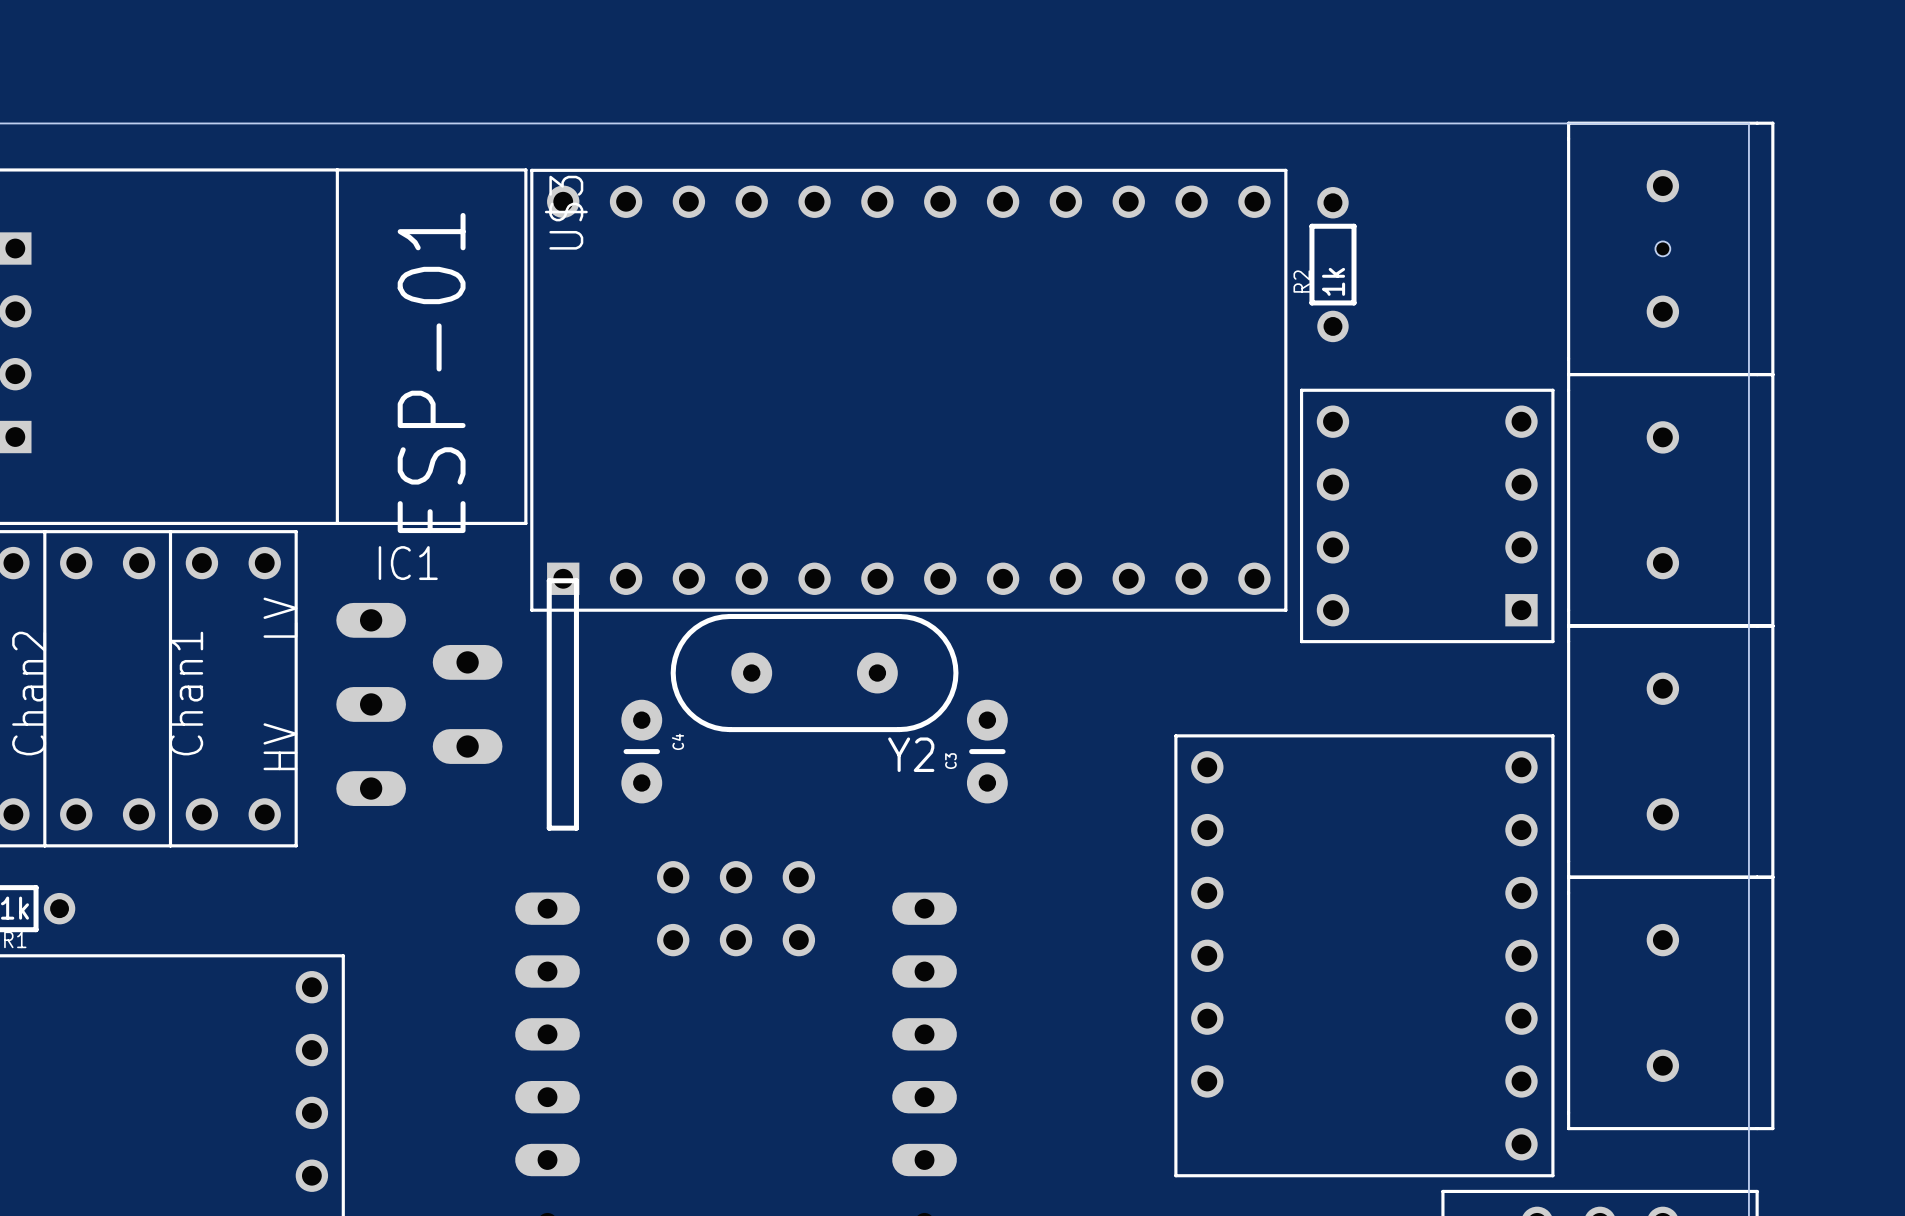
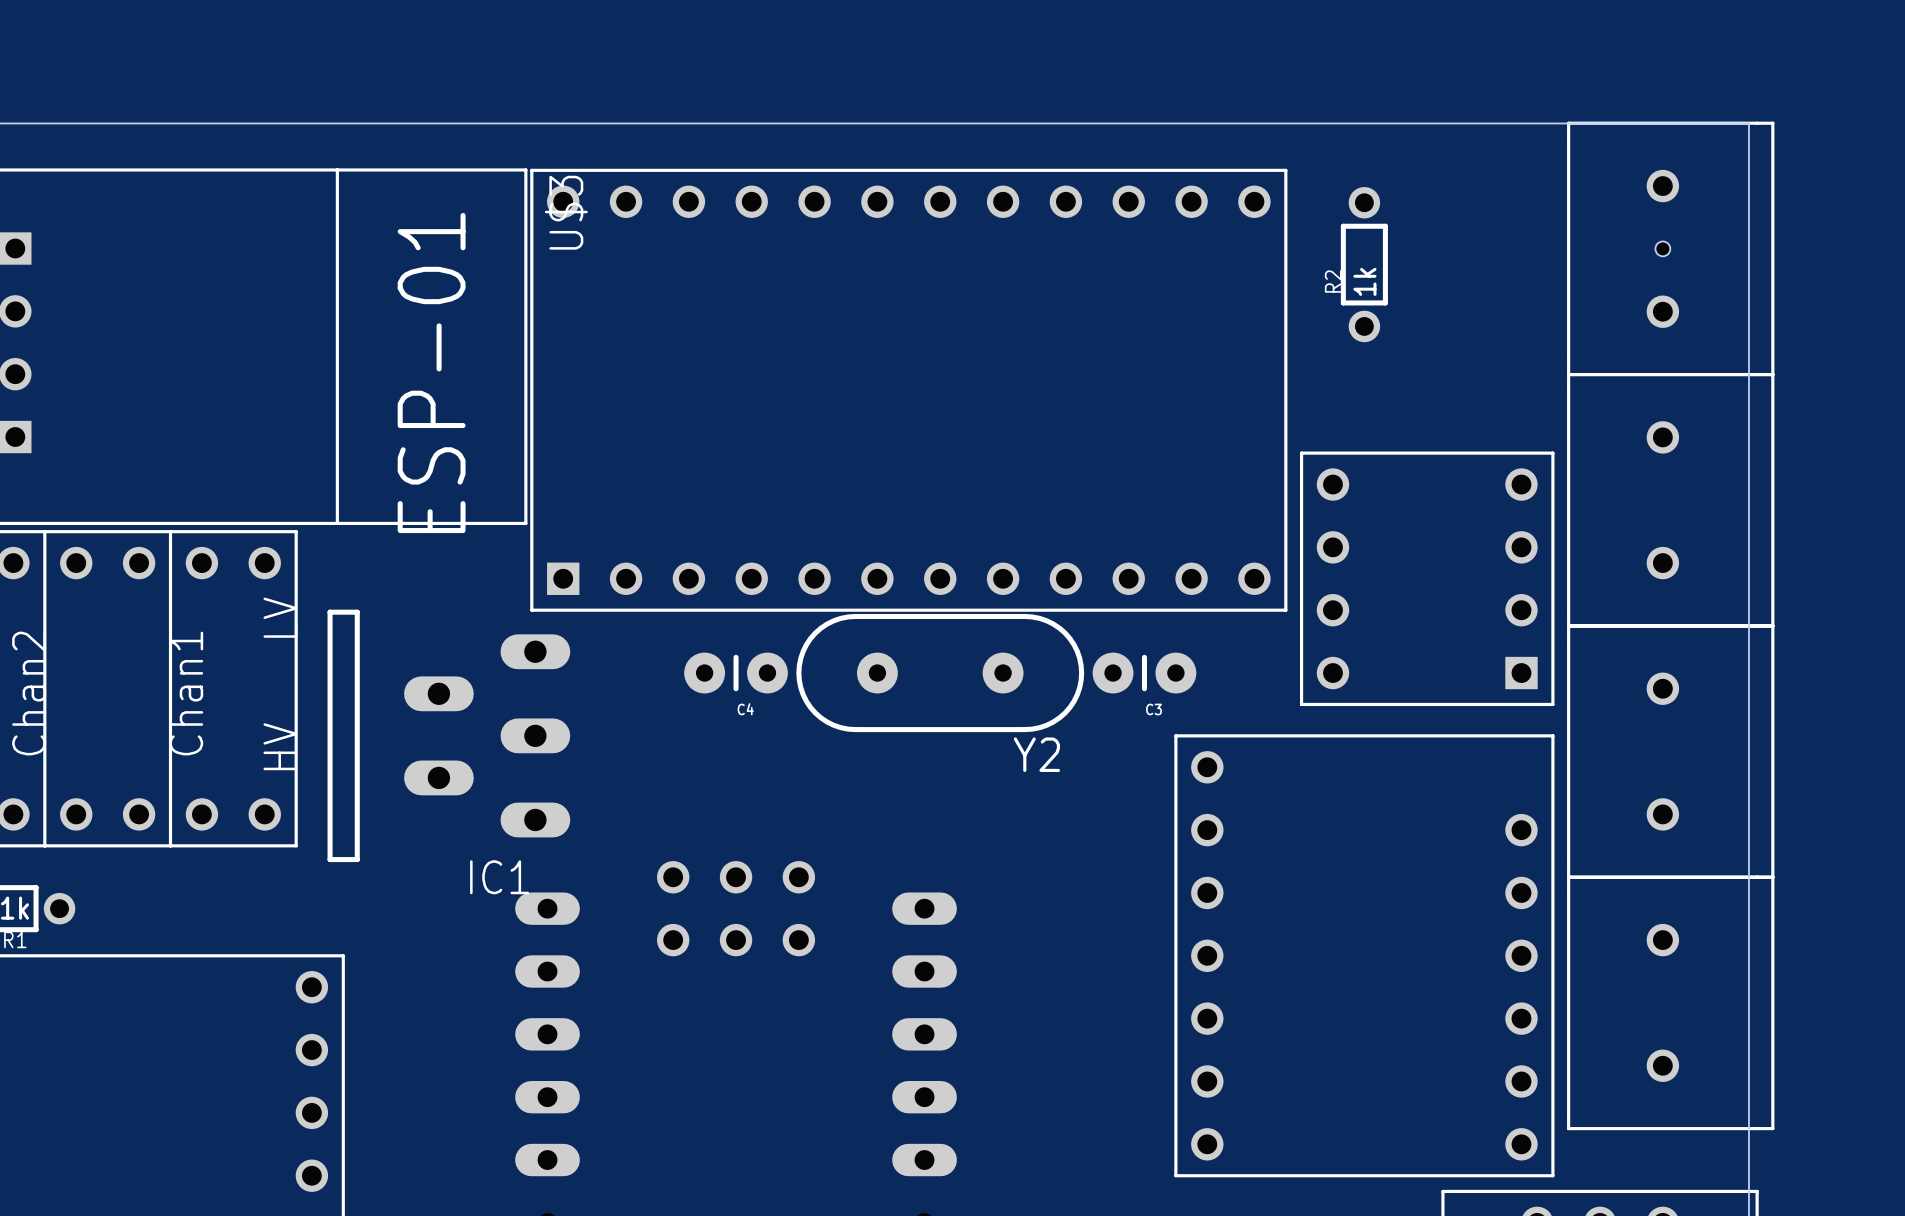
R2 position: (1332, 264) -> (1364, 264)
part position: (1427, 515) -> (1427, 578)
Y2 position: (814, 673) -> (940, 673)
IC1 rotation: 0° (457, 704) -> 180° (448, 735)
C4 rotation: 0° (641, 751) -> 90° clockwise (736, 673)
C4 position: (641, 751) -> (736, 673)
C3 rotation: 0° (987, 751) -> 90° clockwise (1144, 673)
C3 position: (987, 751) -> (1144, 673)
C3 name position: C3 (950, 761) -> C3 (1153, 709)
part rotation: 0° (1364, 955) -> 180° (1364, 955)

